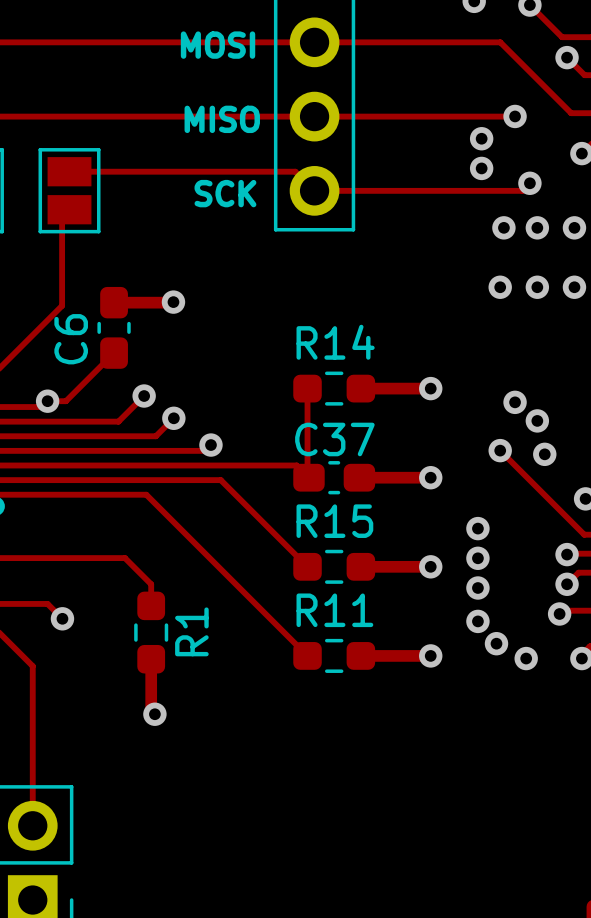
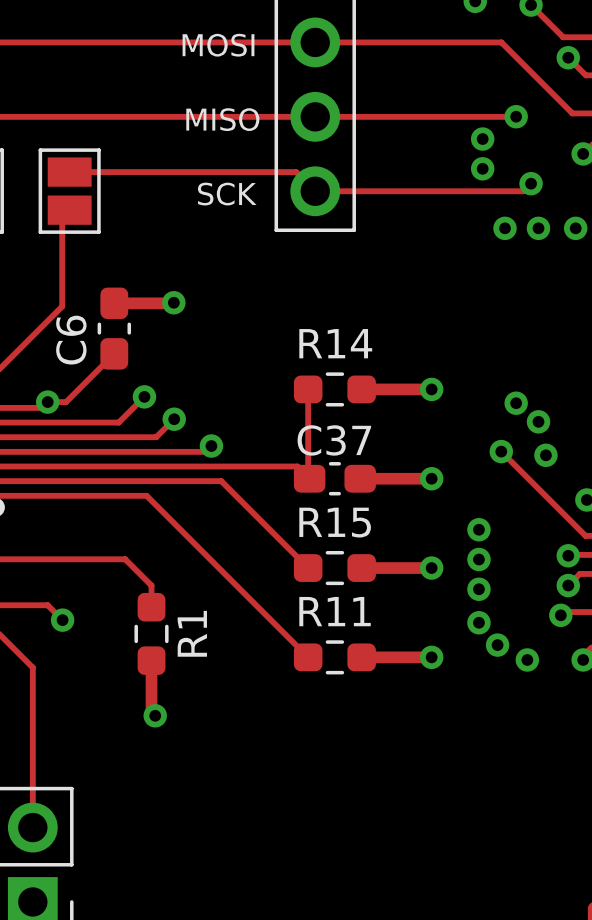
via: (500, 287) -> none
via: (537, 287) -> none
via: (574, 287) -> none

